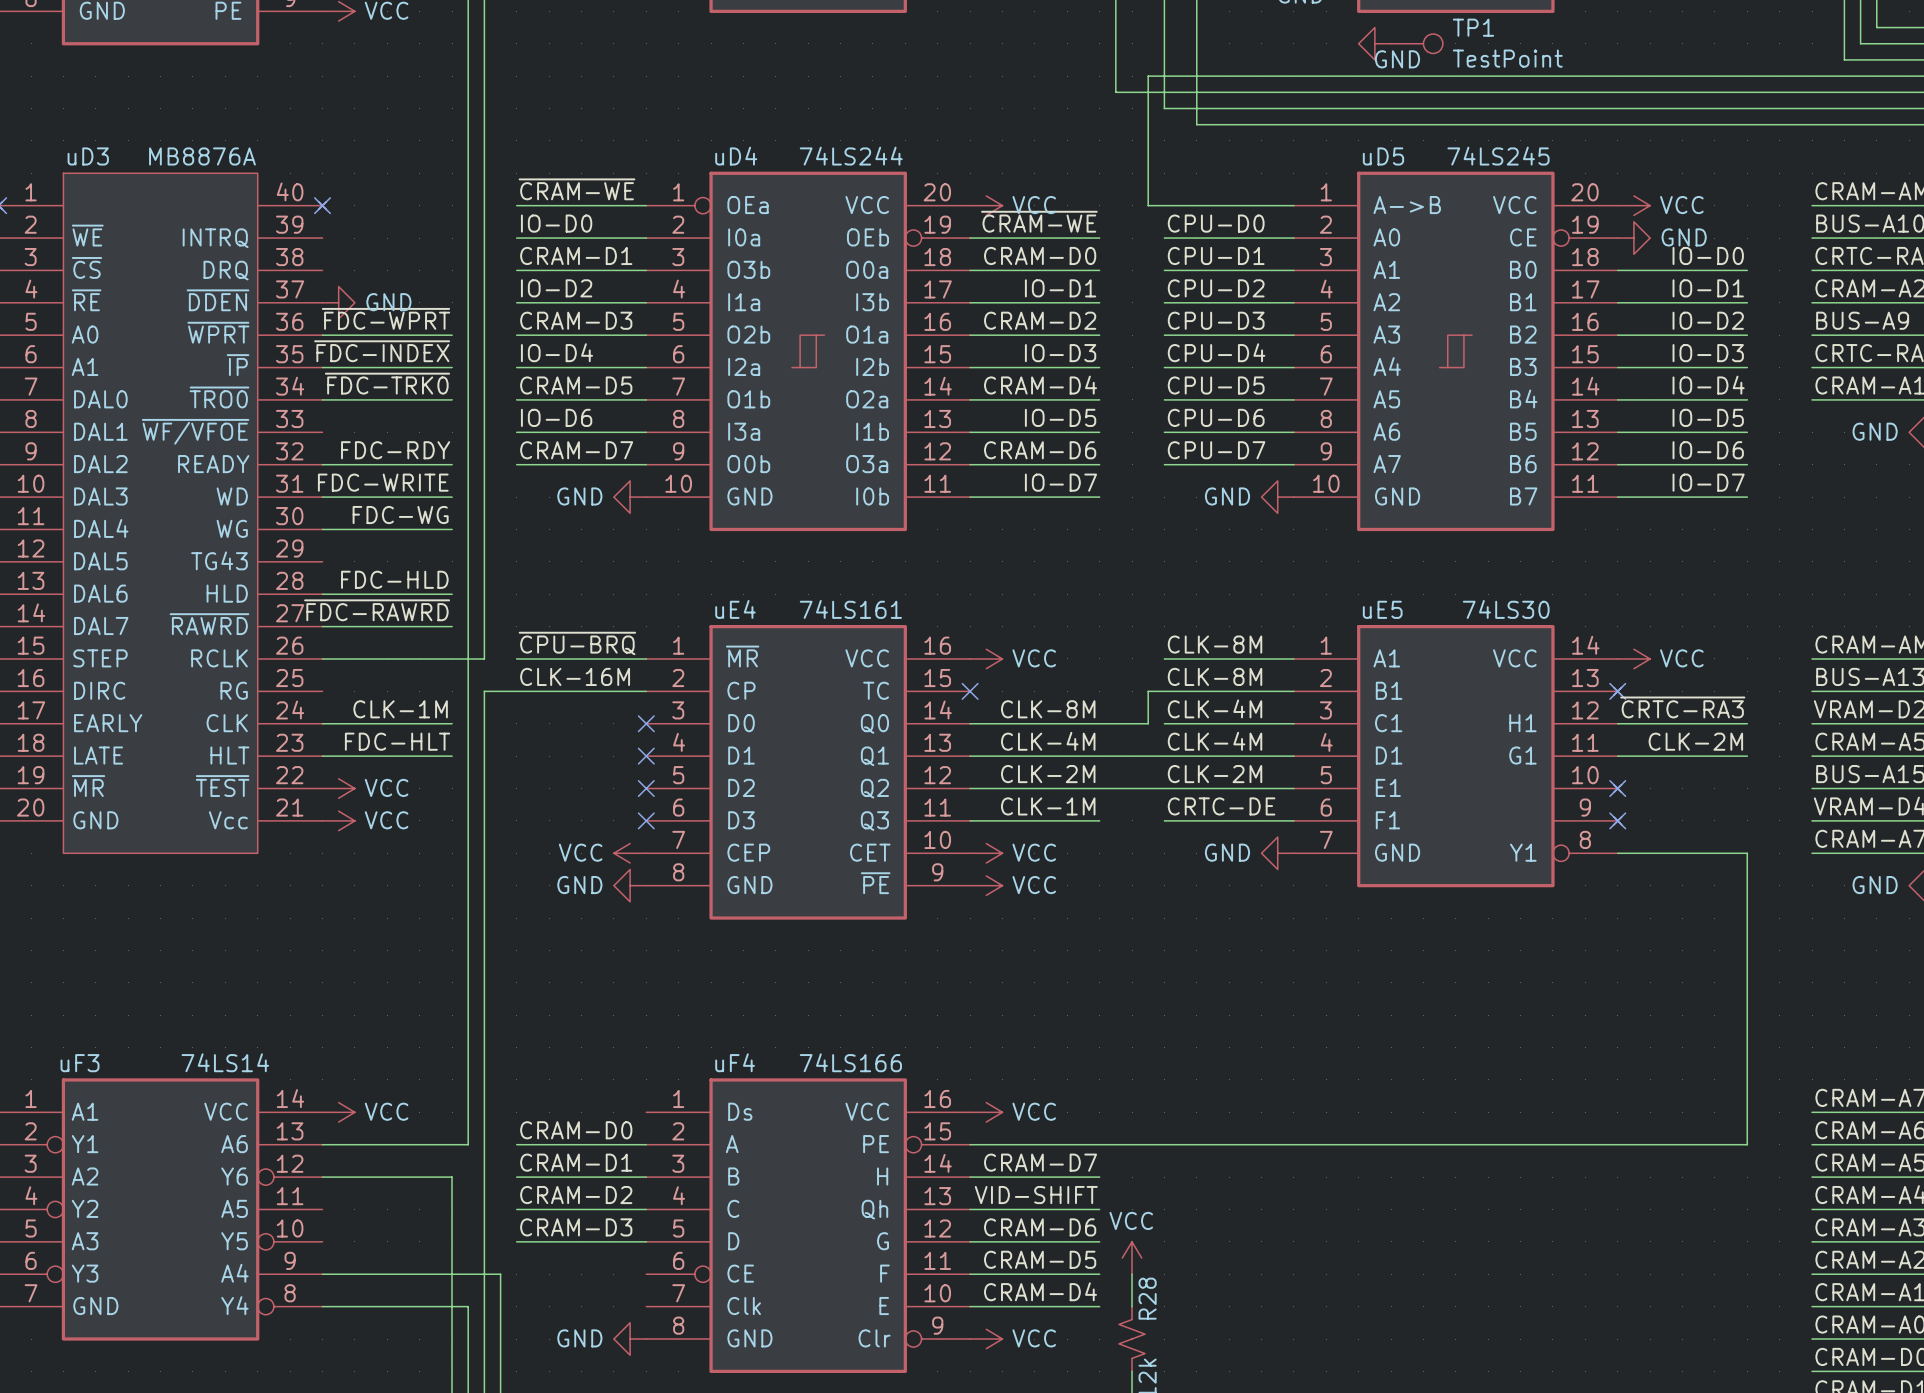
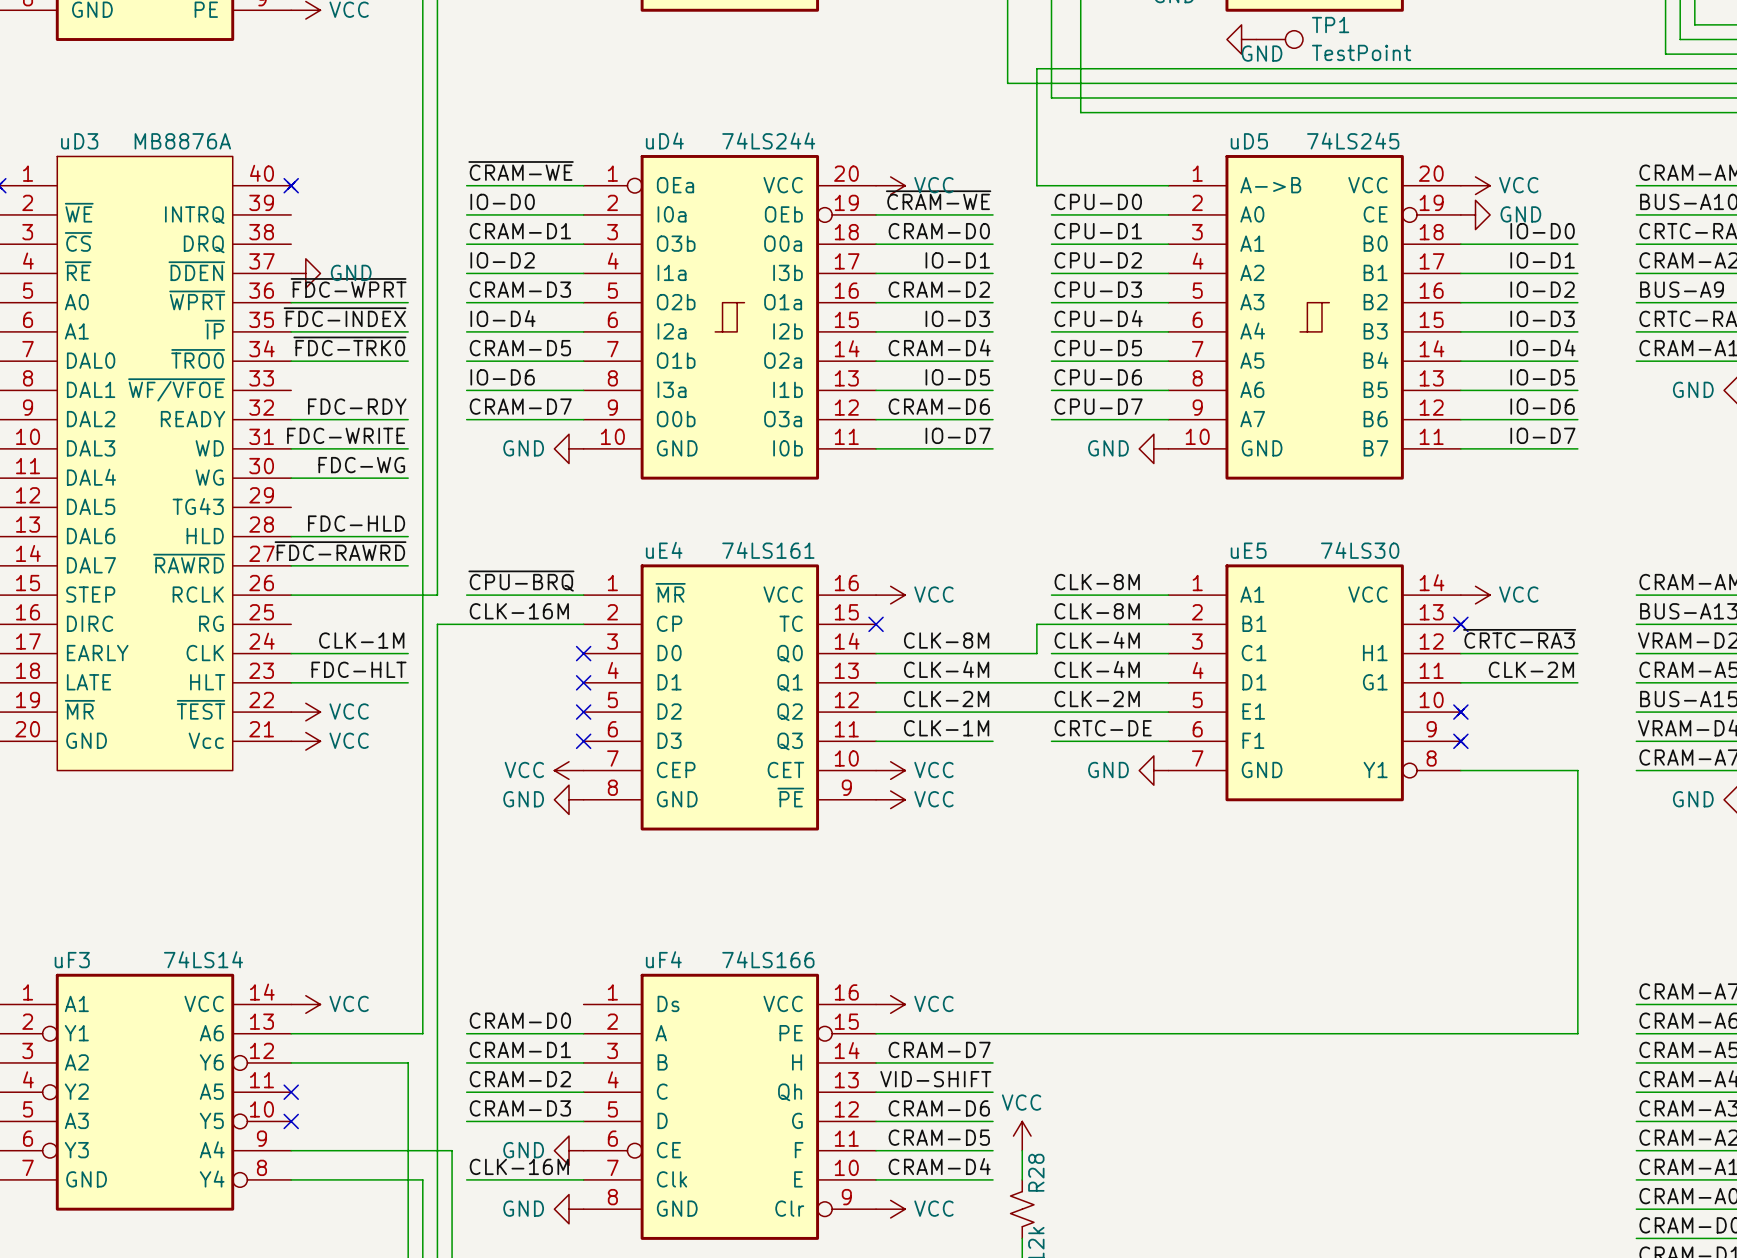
no-connect mark: none -> (291, 1092)
no-connect mark: none -> (291, 1121)
power symbol: none -> GND (569, 1150)
label: none -> CLK-16M (519, 1166)
wire: none -> (466, 1179) (583, 1179)

